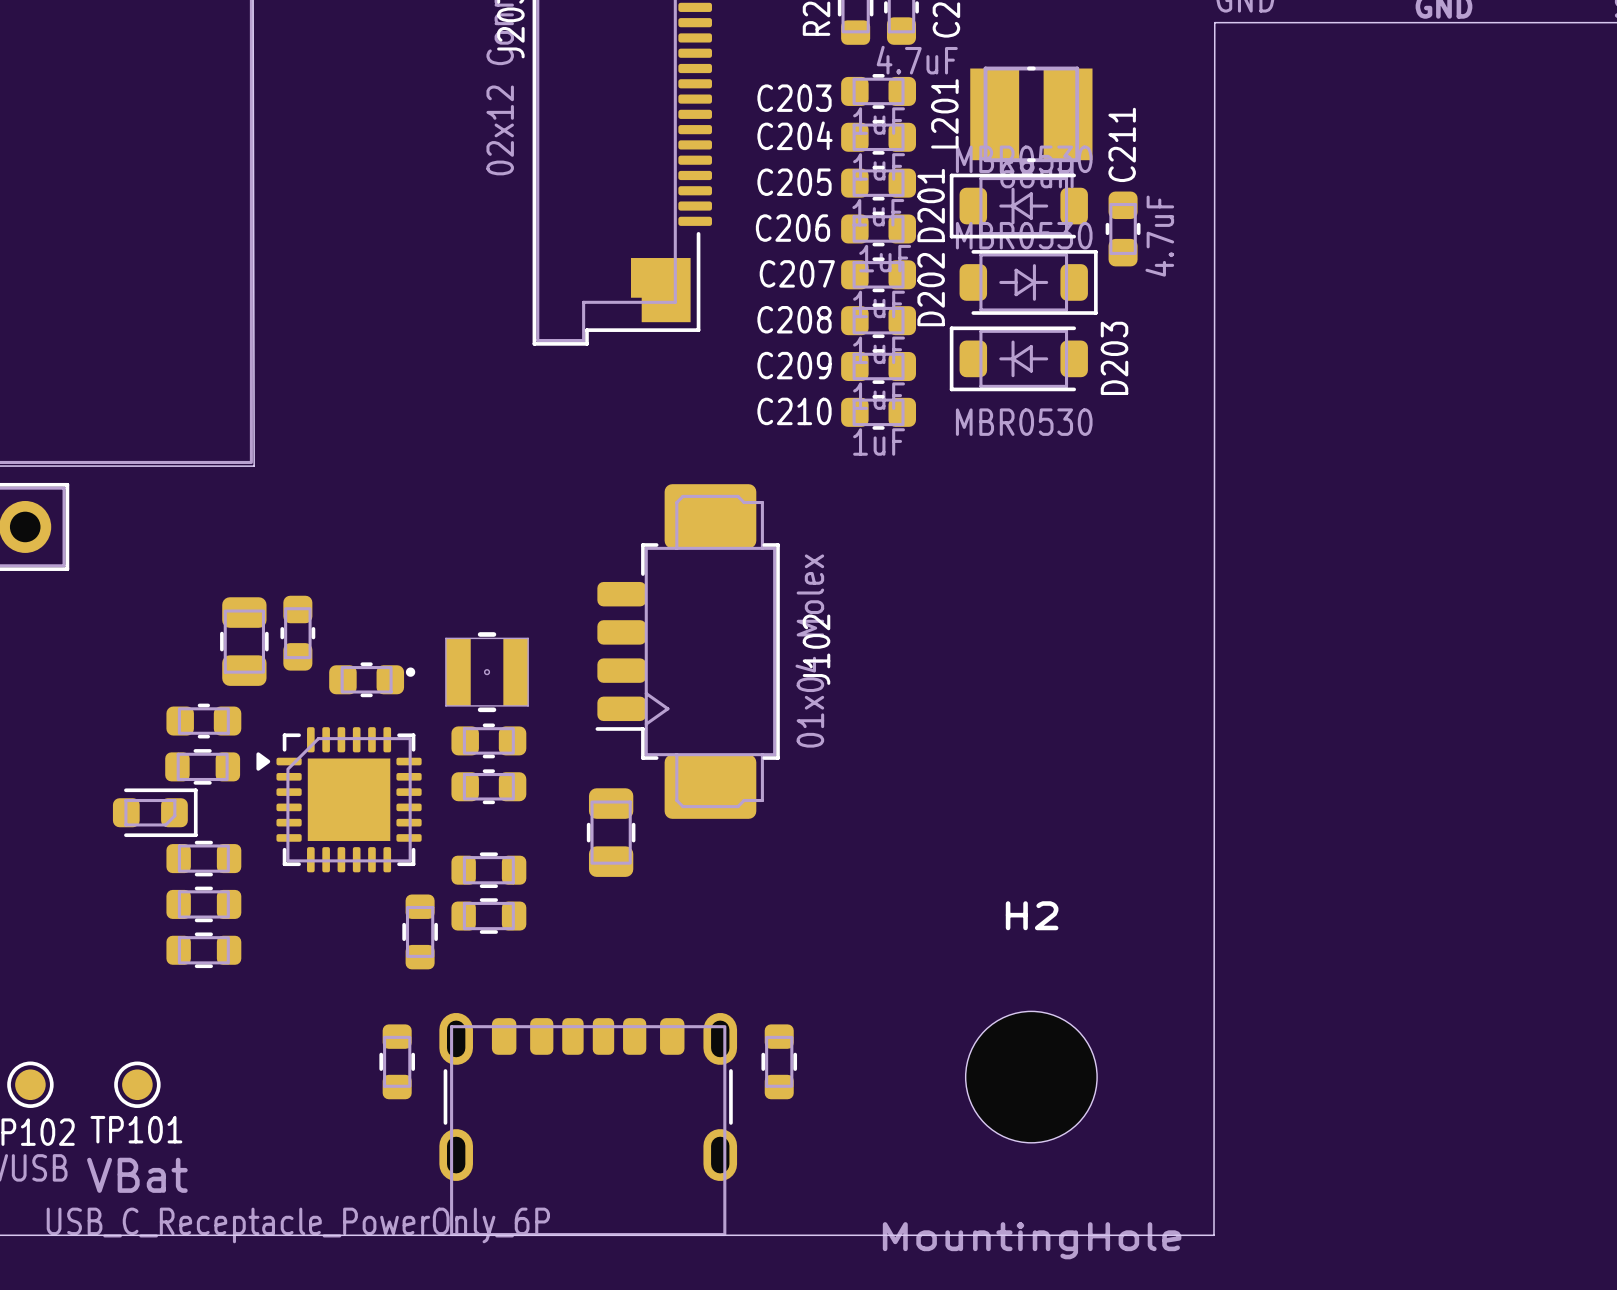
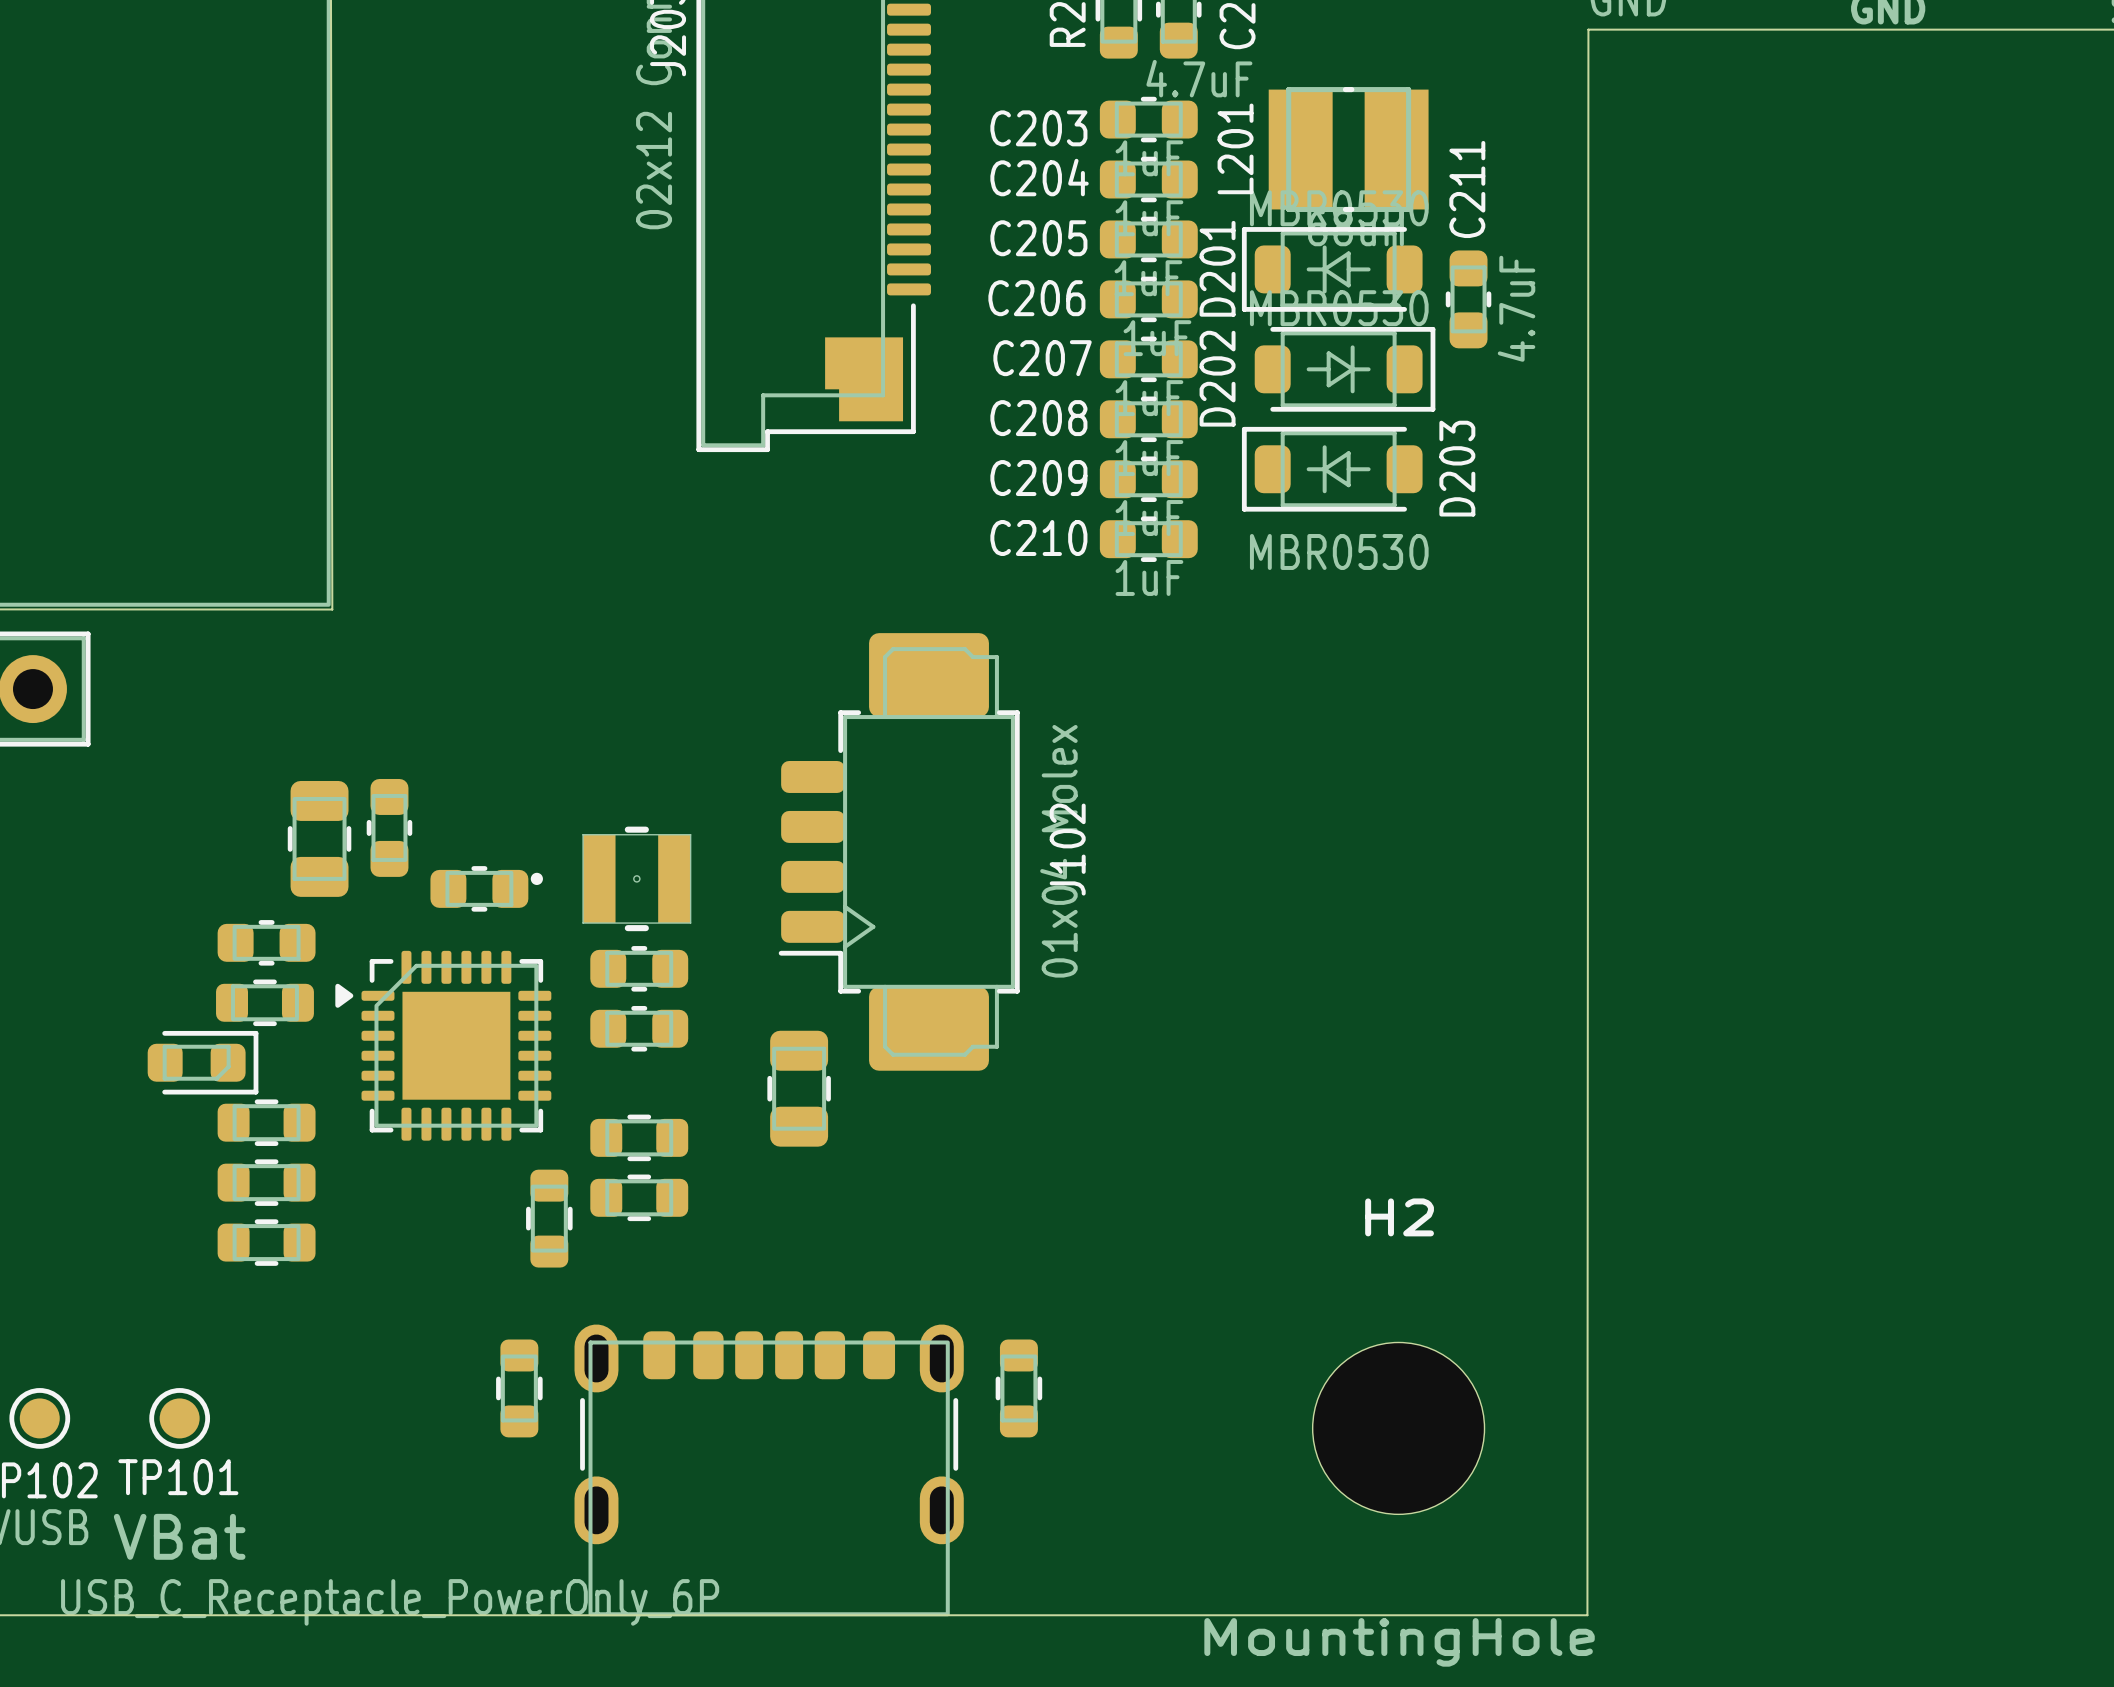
H2 position: (1031, 1077) -> (1398, 1428)

